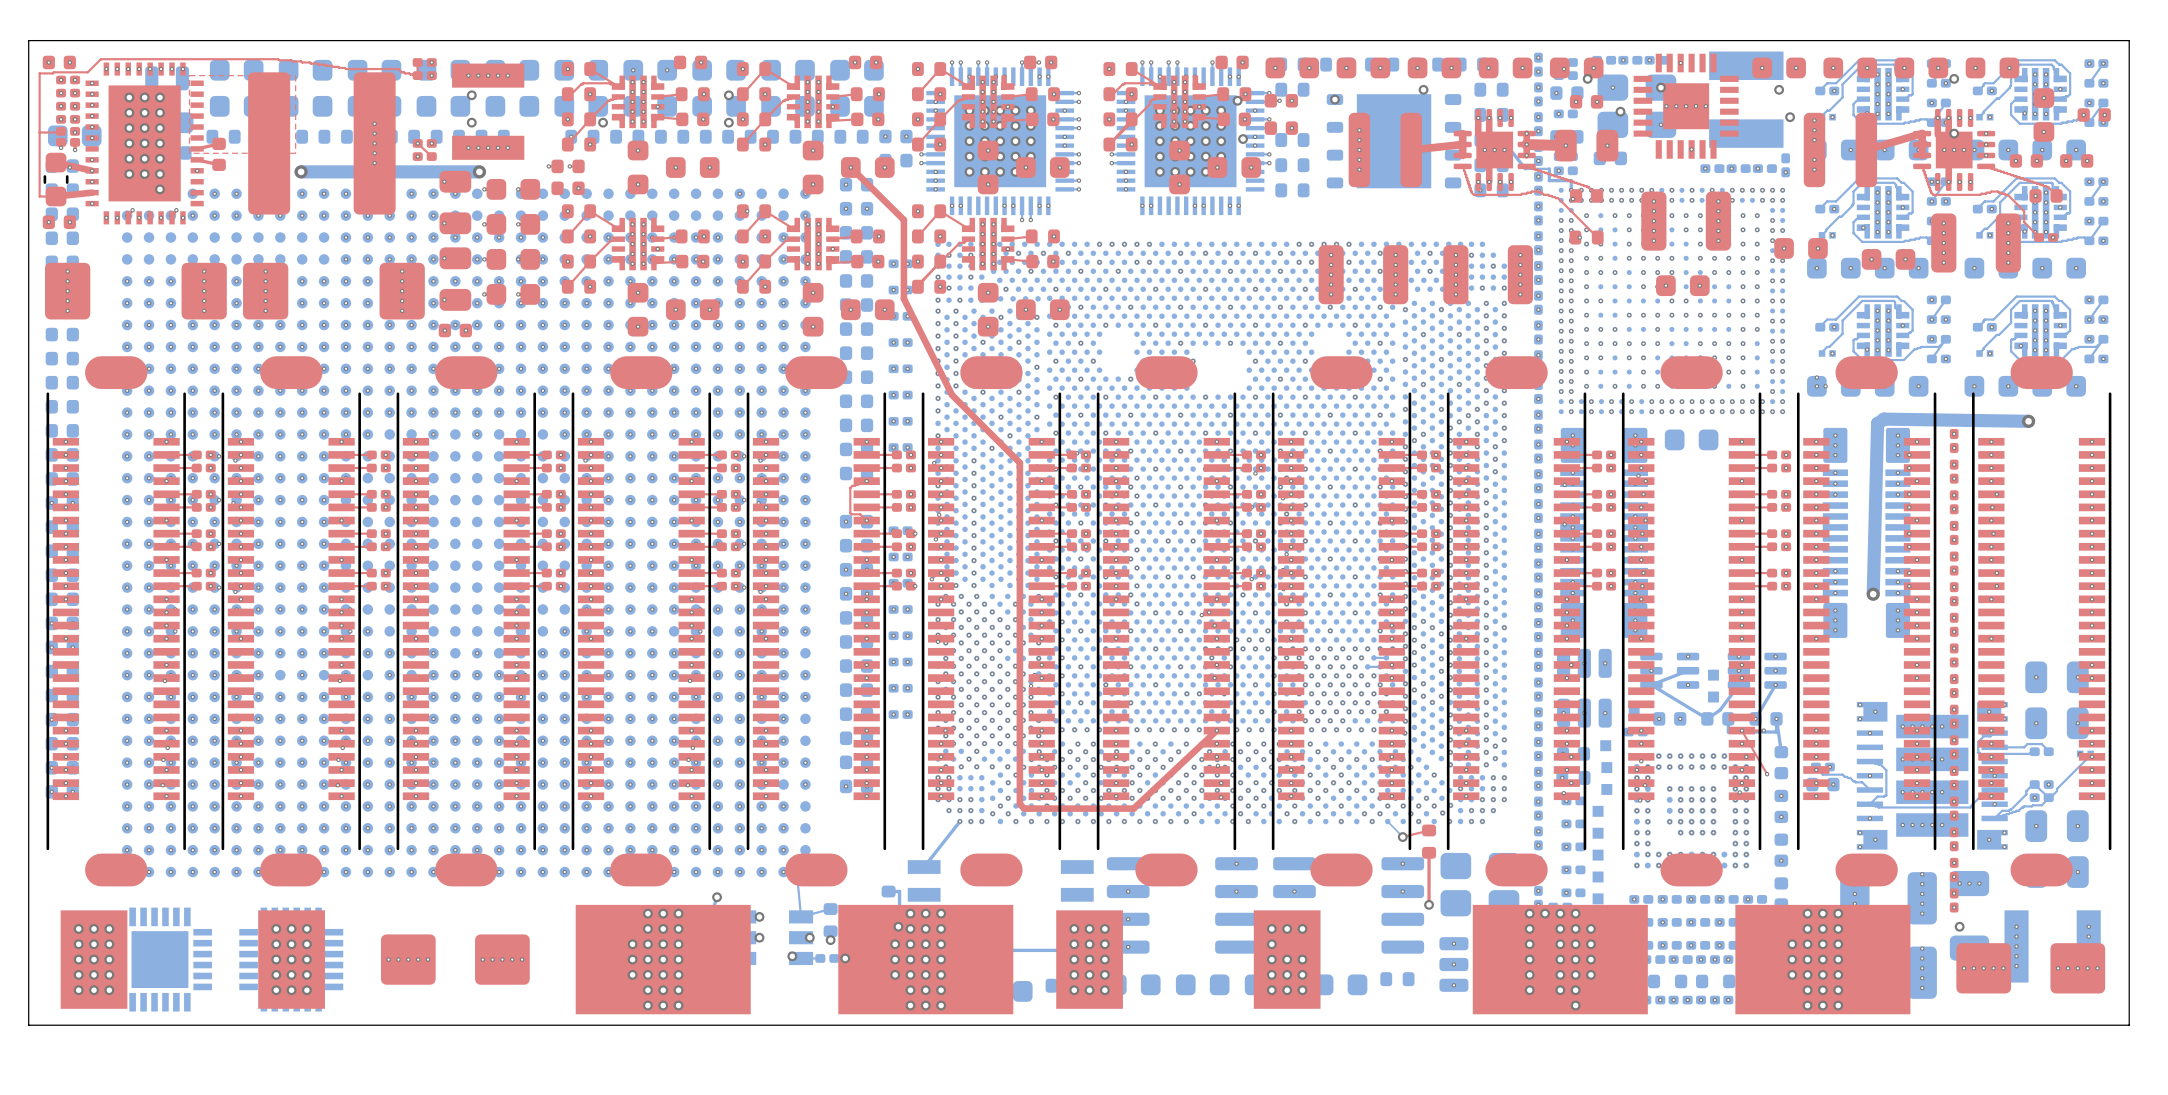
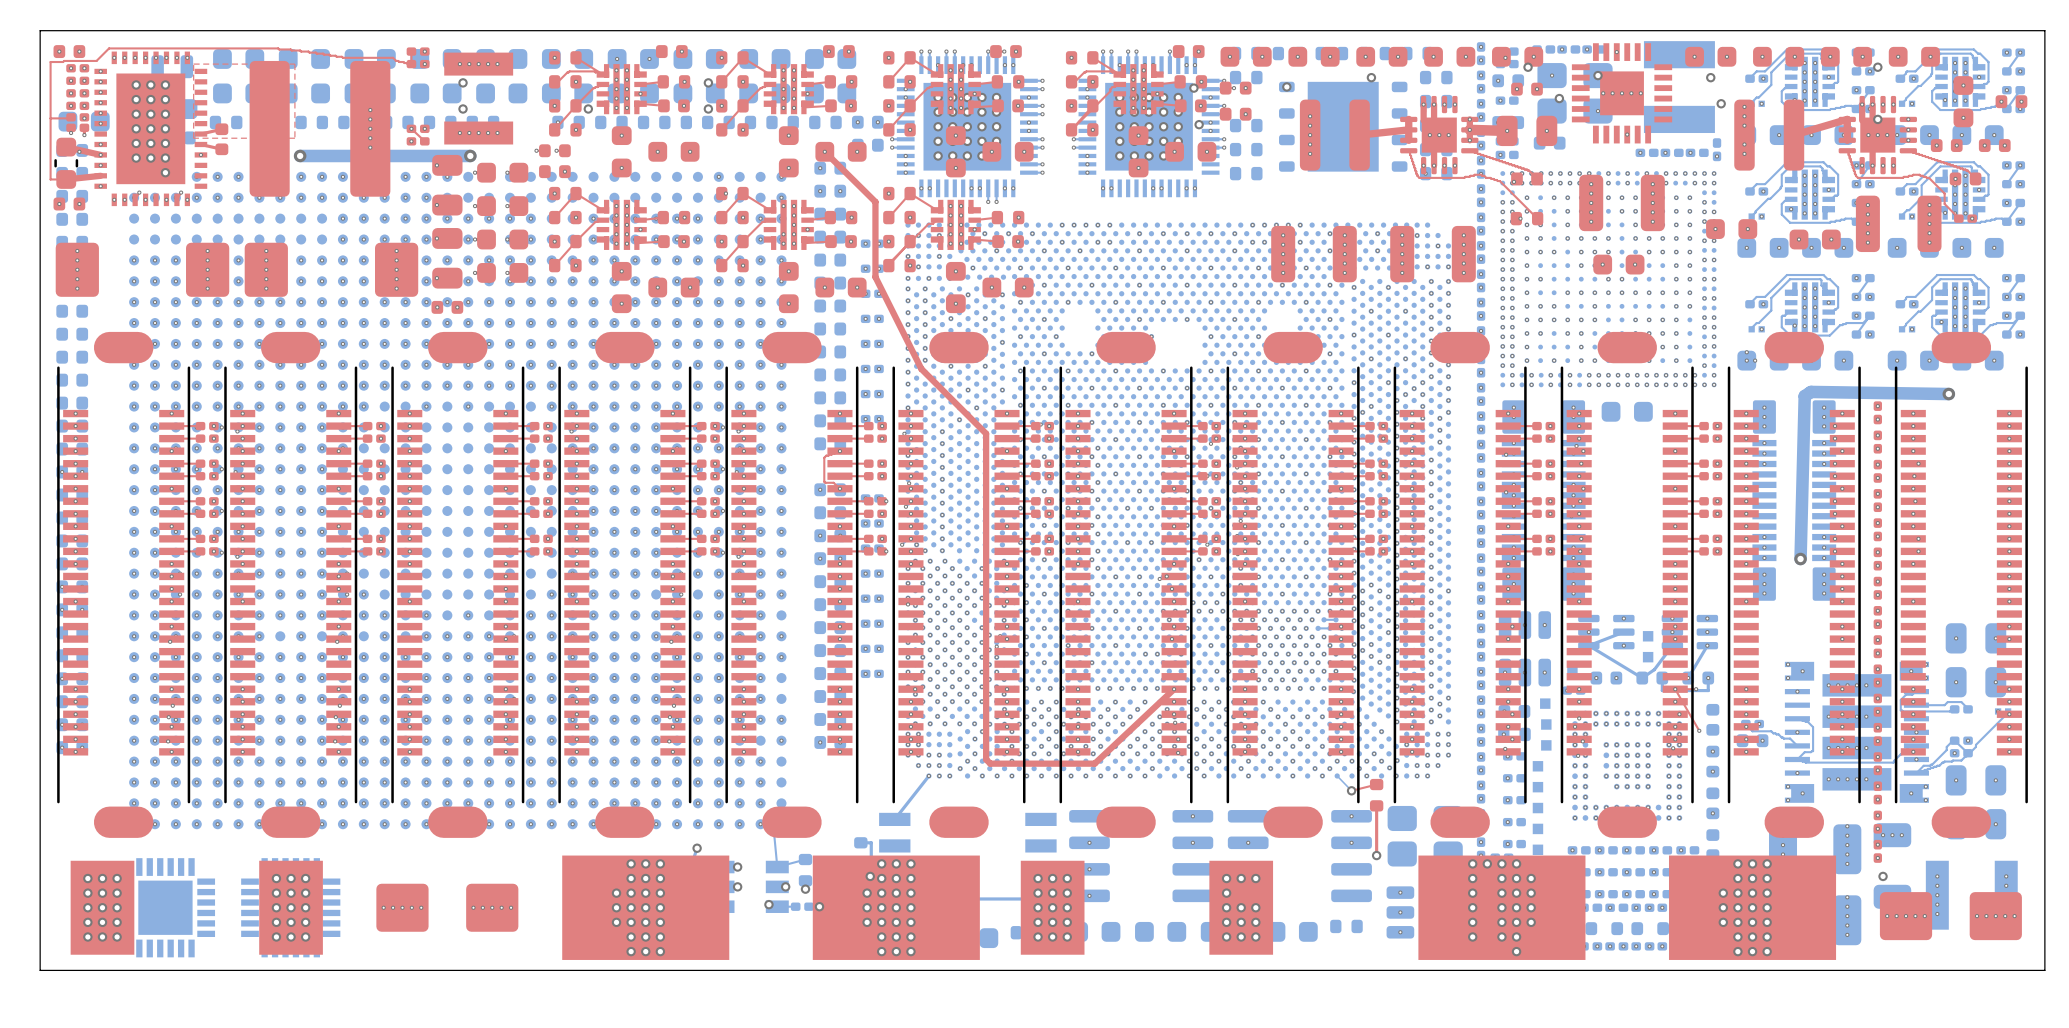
bottom track: (1502, 140) (1525, 168) (1549, 168) (1549, 180) (1571, 180) (1571, 190) -> none
bottom track: (1776, 718) (1781, 752) -> none

